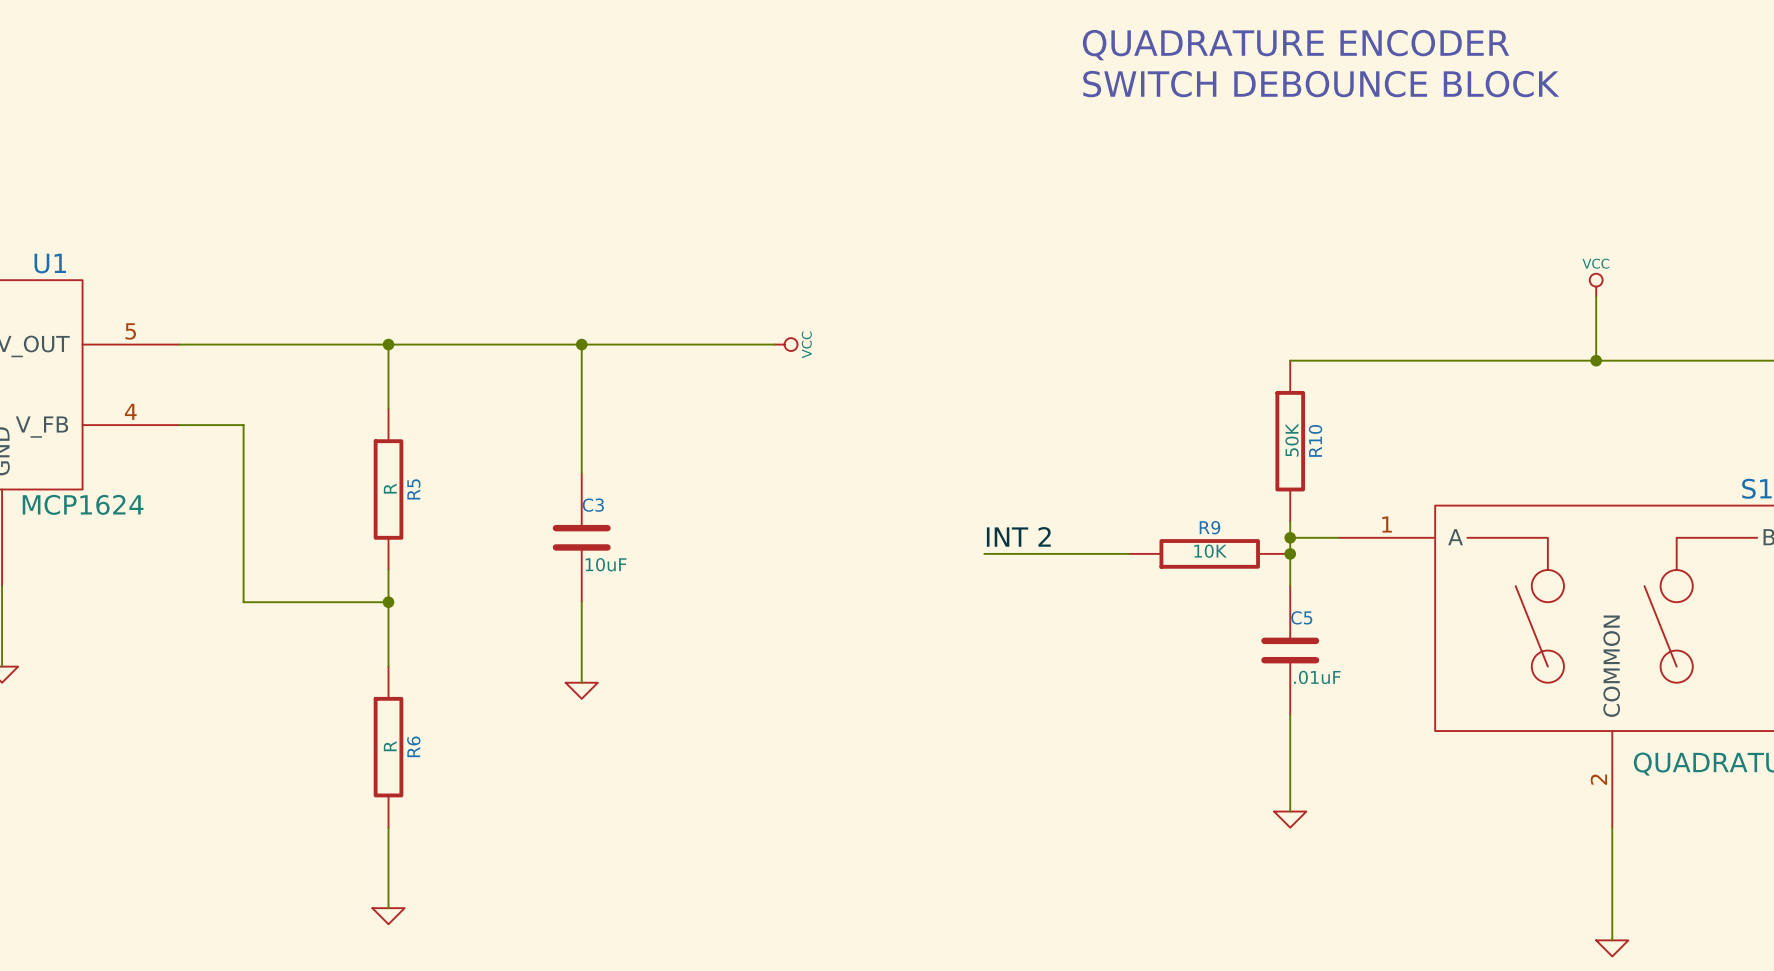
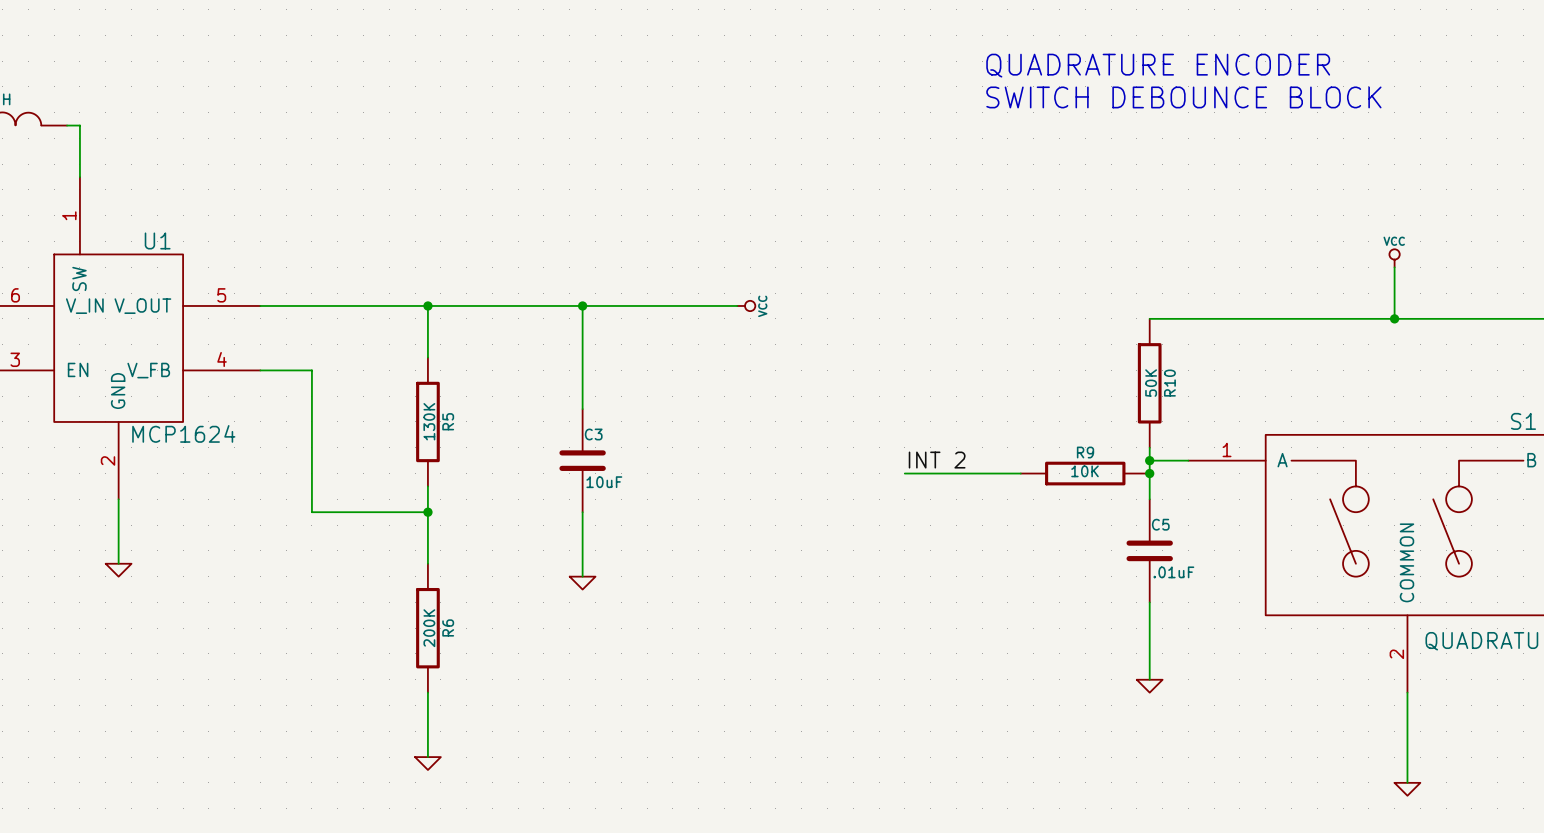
R5 value: R (390, 488) -> 130K (429, 421)
R6 value: R (390, 746) -> 200K (429, 628)

